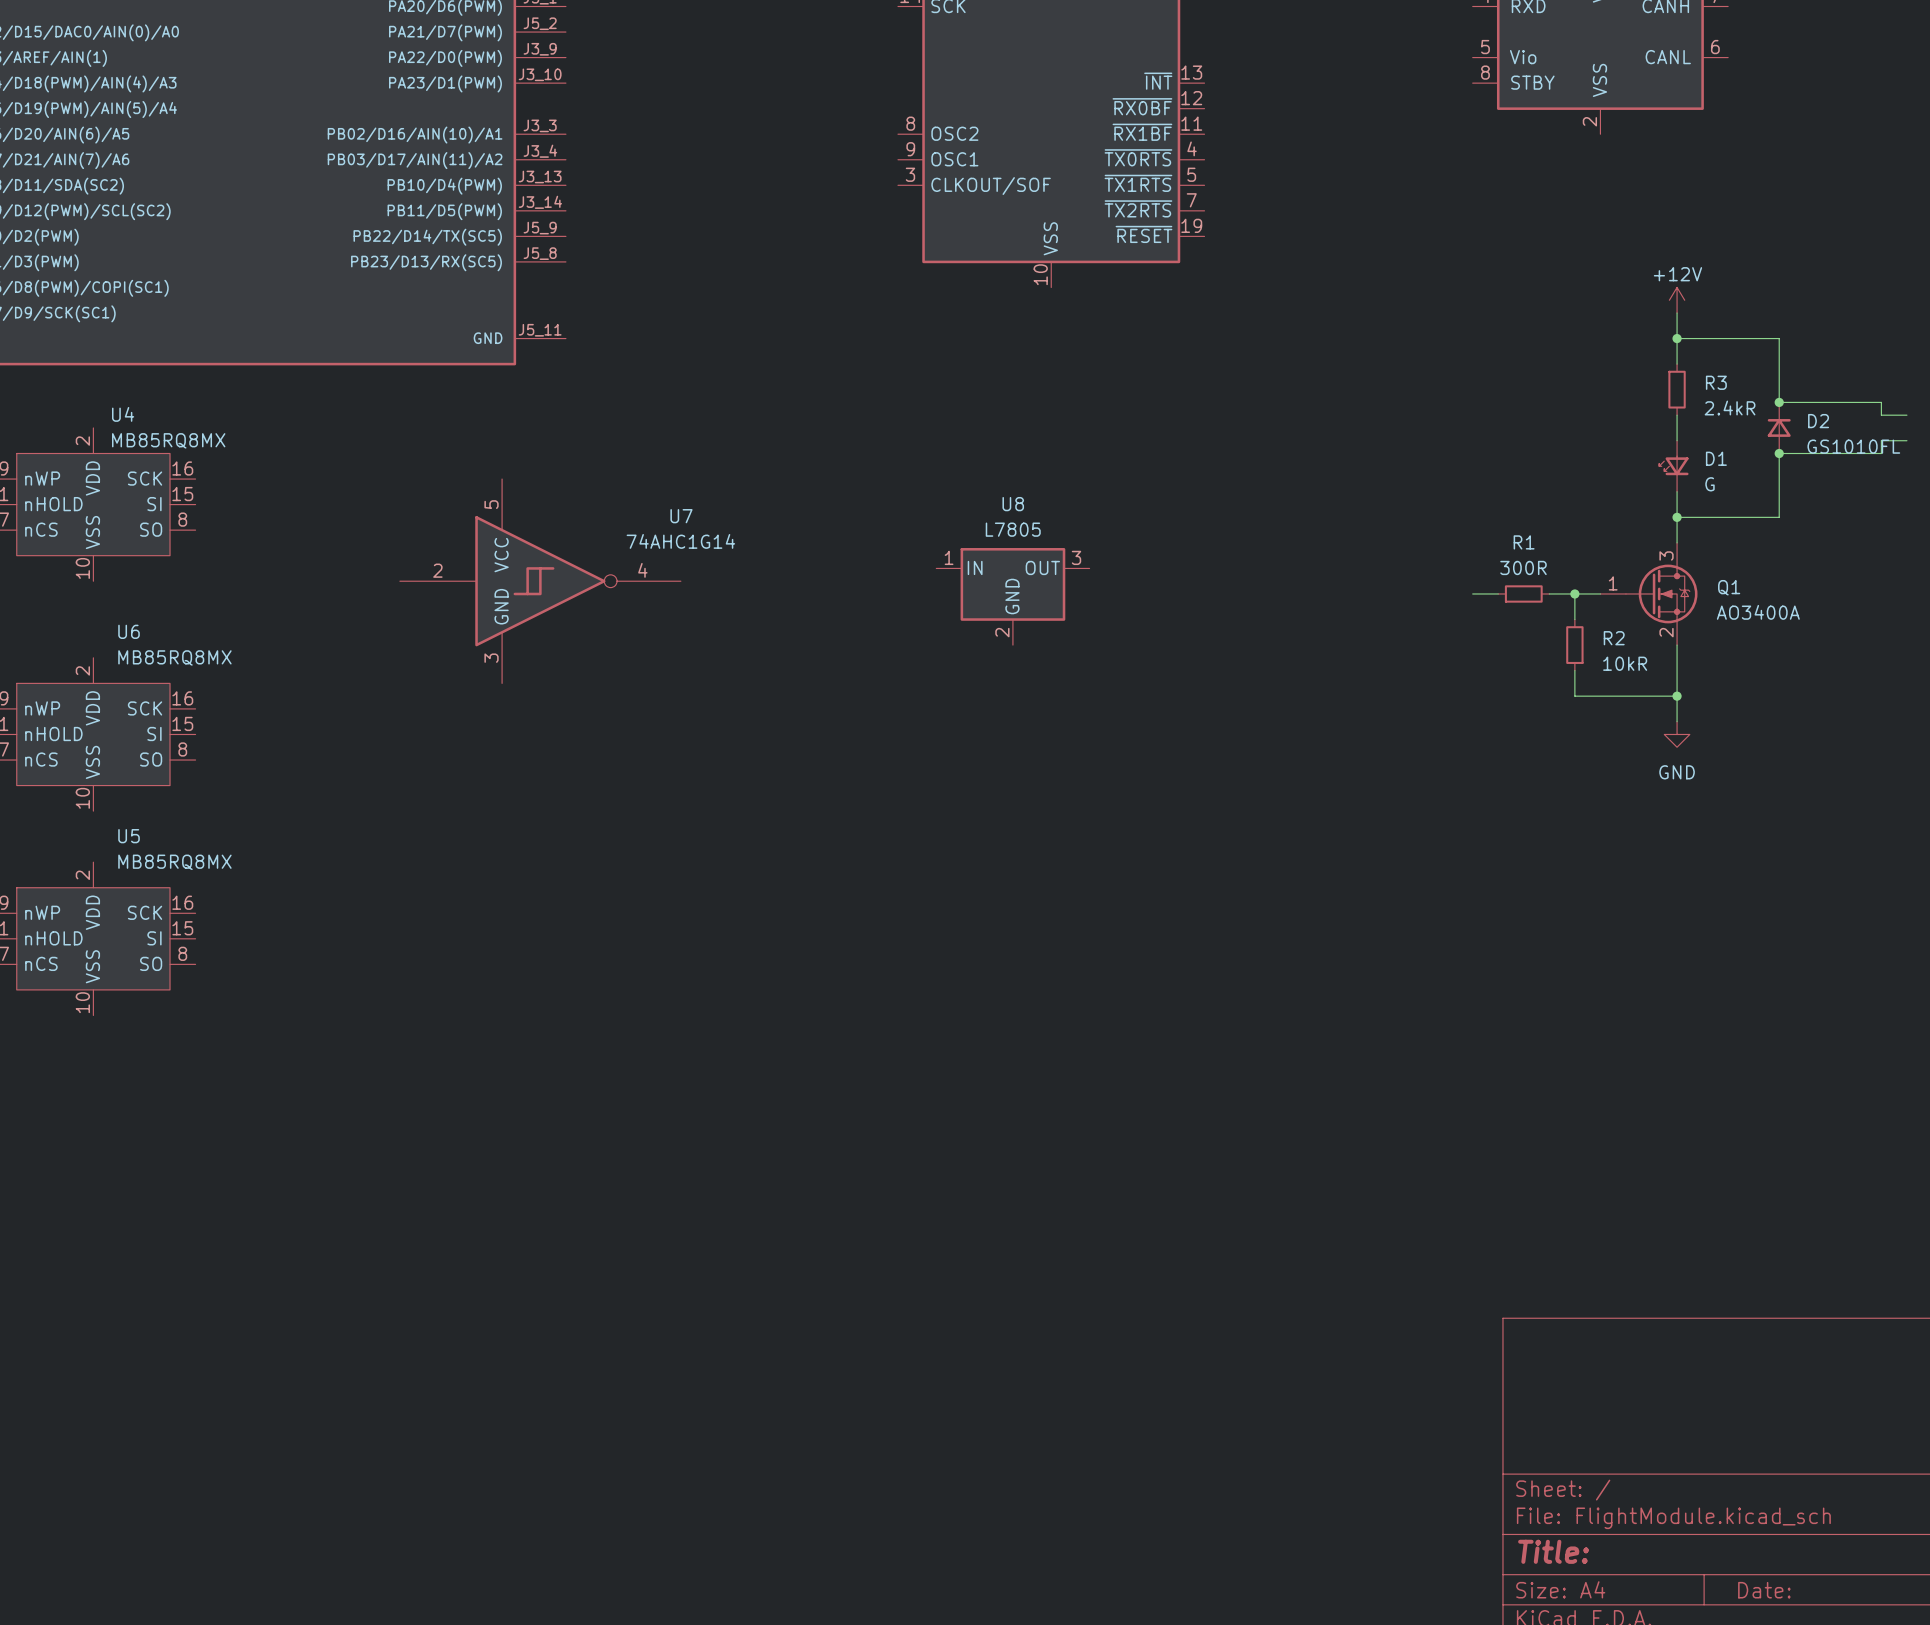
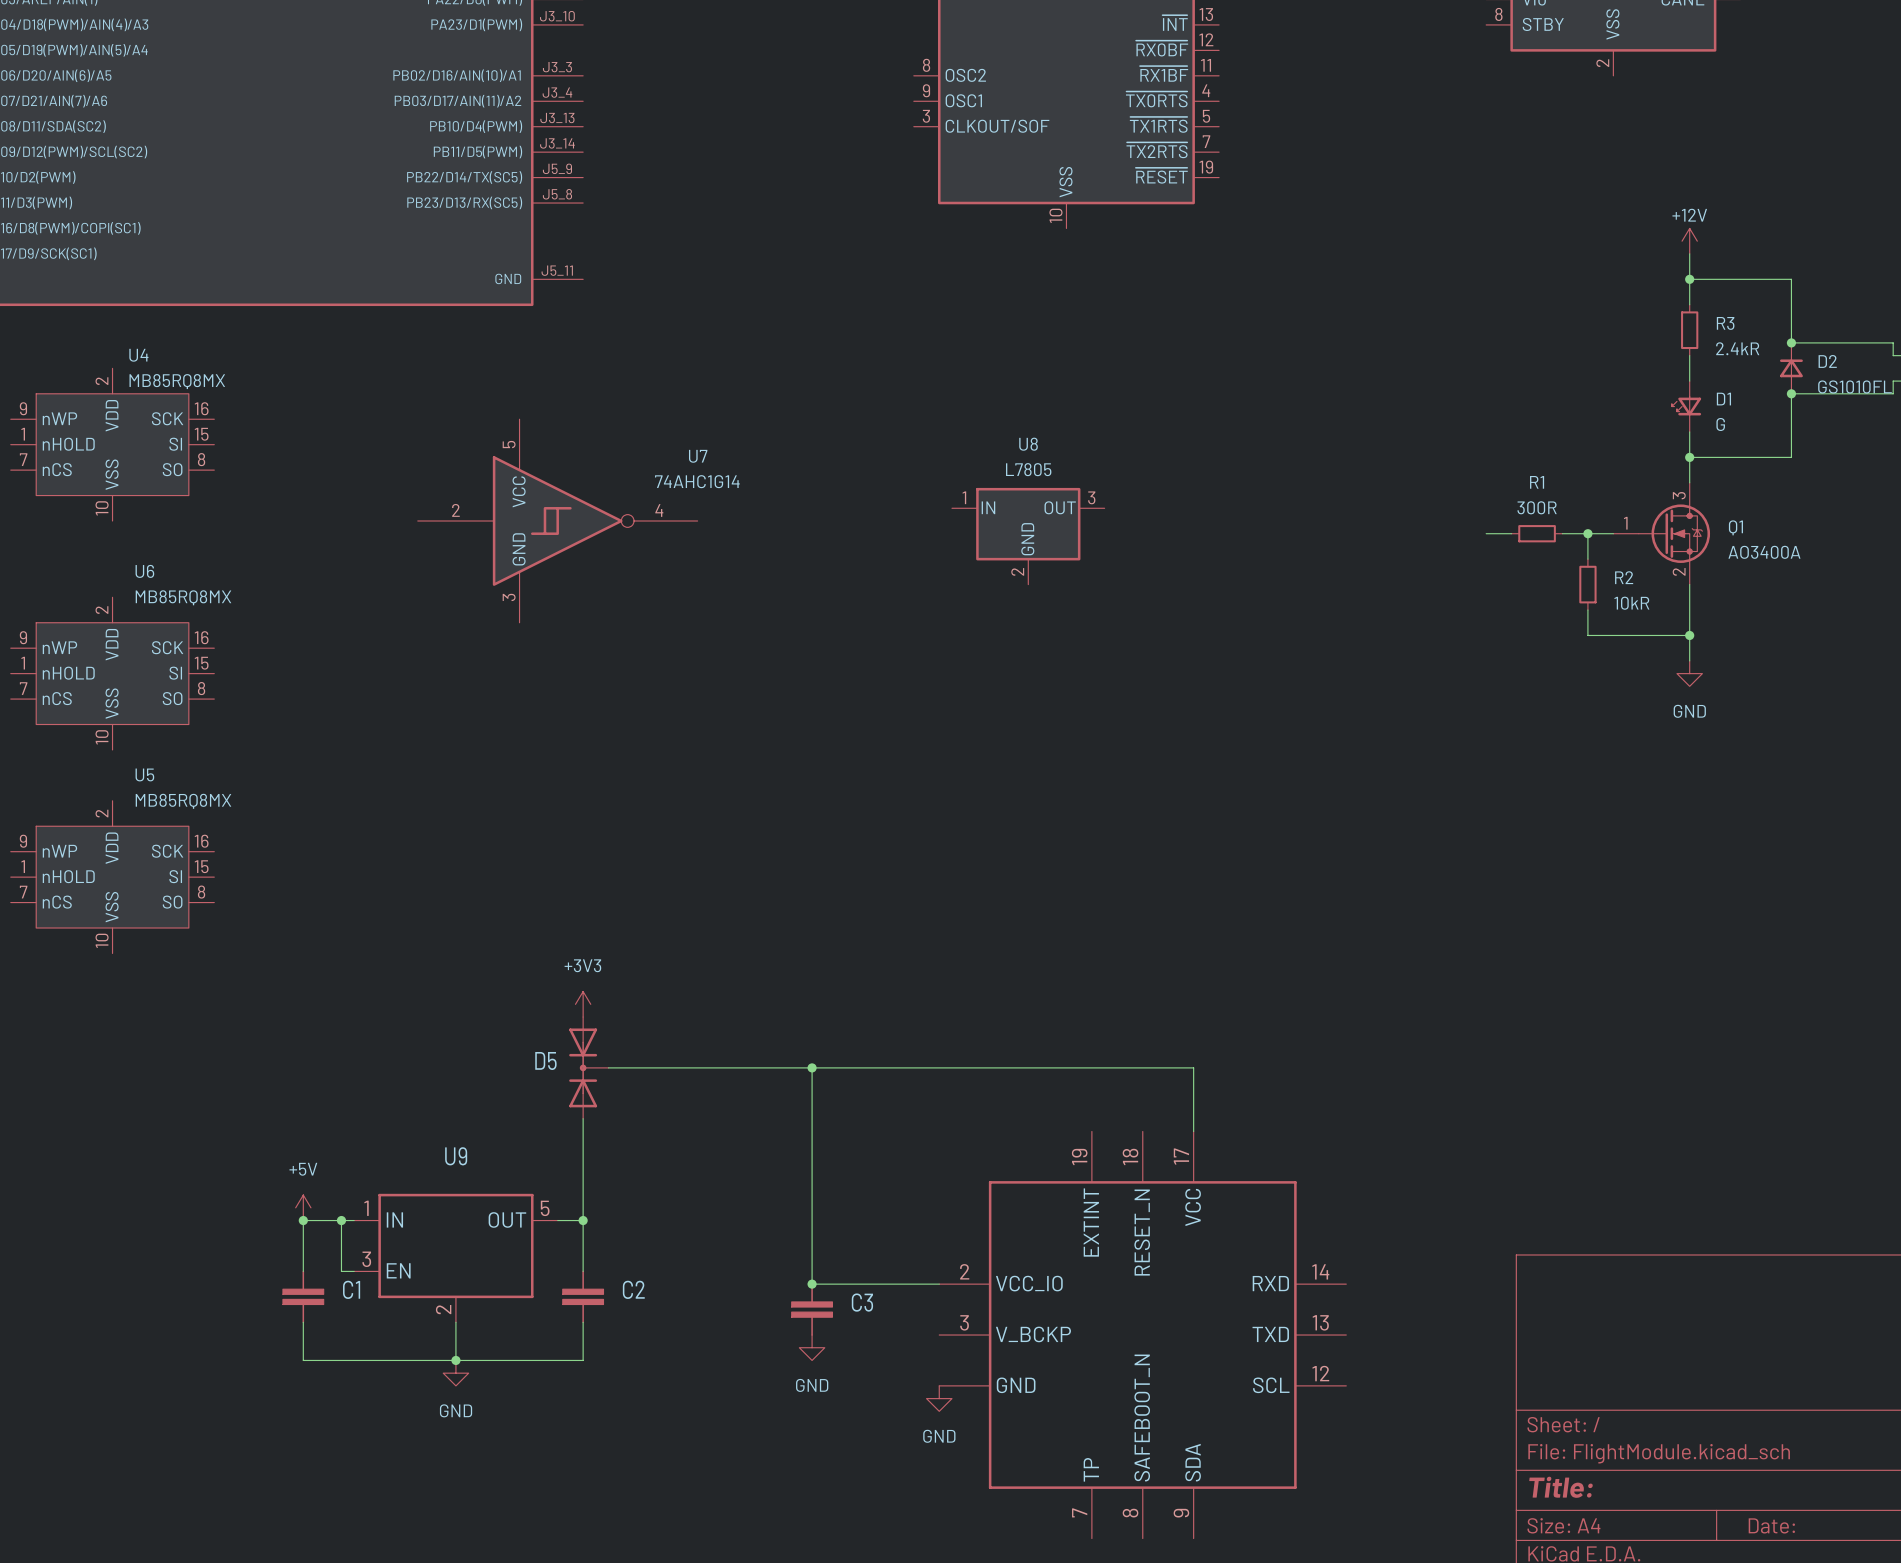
power symbol: none -> +3V3 (583, 1004)
D5: none -> (588, 1067)
wire: none -> (608, 1067) (1193, 1067) (1193, 1131)
wire: none -> (812, 1067) (812, 1284) (939, 1284)
junction: none -> (812, 1067)
wire: none -> (583, 1118) (583, 1271)
power symbol: none -> +5V (303, 1207)
junction: none -> (303, 1220)
wire: none -> (341, 1220) (341, 1271) (354, 1271)
junction: none -> (341, 1220)
wire: none -> (354, 1220) (303, 1220) (303, 1271)
wire: none -> (557, 1220) (583, 1220)
junction: none -> (583, 1220)
U9: none -> (455, 1258)
junction: none -> (812, 1284)
C1: none -> (303, 1296)
C2: none -> (583, 1296)
C3: none -> (812, 1309)
wire: none -> (303, 1322) (303, 1360) (583, 1360) (583, 1322)
wire: none -> (455, 1322) (455, 1360)
part: none -> (1142, 1335)
power symbol: none -> GND (812, 1347)
junction: none -> (455, 1360)
power symbol: none -> GND (455, 1373)
power symbol: none -> GND (939, 1398)

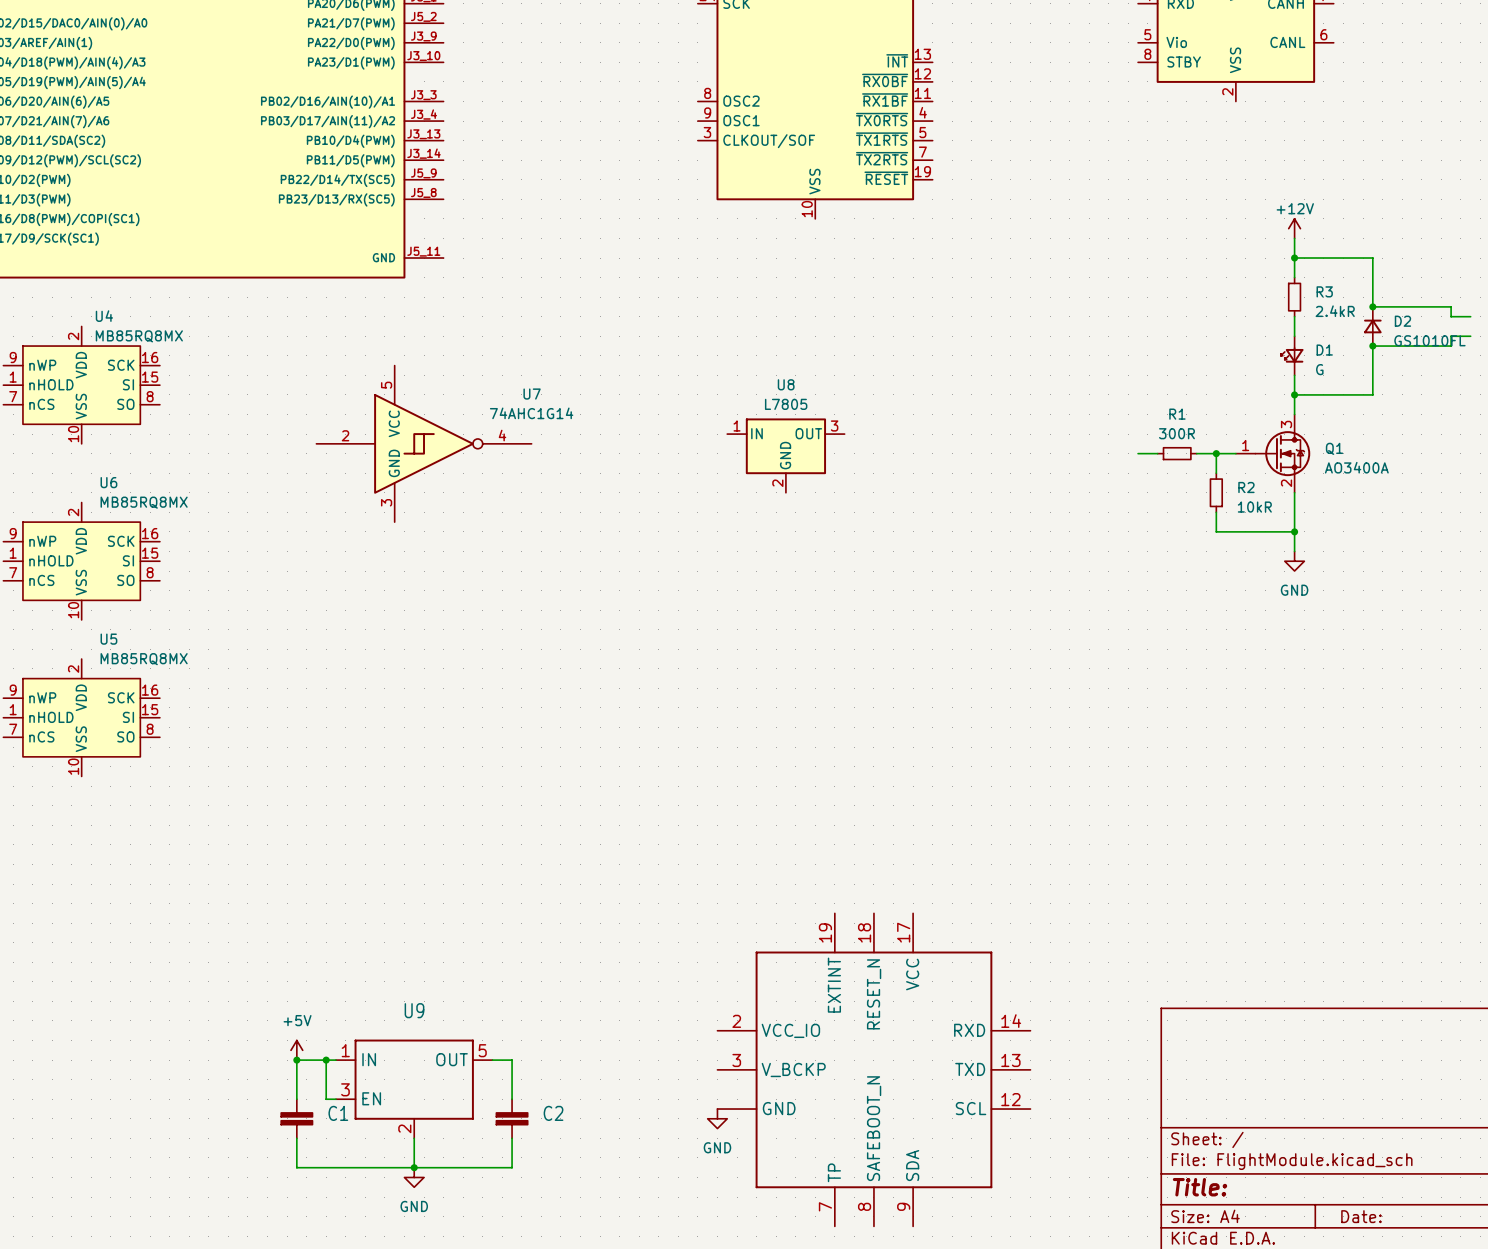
power symbol: +3V3 (583, 1004) -> none
D5: (588, 1067) -> none
wire: (608, 1067) (1193, 1067) (1193, 1131) -> none
wire: (812, 1067) (812, 1284) (939, 1284) -> none
junction: (812, 1067) -> none
wire: (583, 1118) (583, 1271) -> none
power symbol position: +5V (303, 1207) -> +5V (296, 1050)
junction: (303, 1220) -> none
wire: (341, 1220) (341, 1271) (354, 1271) -> (326, 1060) (326, 1099) (335, 1099)
junction: (341, 1220) -> none
wire: (354, 1220) (303, 1220) (303, 1271) -> (335, 1060) (296, 1060) (296, 1099)
wire: (557, 1220) (583, 1220) -> none
junction: (583, 1220) -> none
U9 position: (455, 1258) -> (414, 1088)
junction: (812, 1284) -> none
C1 position: (303, 1296) -> (296, 1118)
C2 position: (583, 1296) -> (512, 1118)
C3: (812, 1309) -> none
wire: (303, 1322) (303, 1360) (583, 1360) (583, 1322) -> (296, 1138) (296, 1167) (512, 1167) (512, 1138)
junction: none -> (296, 1060)
junction: none -> (326, 1060)
wire: (455, 1322) (455, 1360) -> (414, 1138) (414, 1167)
wire: none -> (492, 1060) (512, 1060) (512, 1099)
power symbol: GND (812, 1347) -> none
junction: (455, 1360) -> none
power symbol position: GND (455, 1373) -> GND (414, 1177)
junction: none -> (414, 1167)

